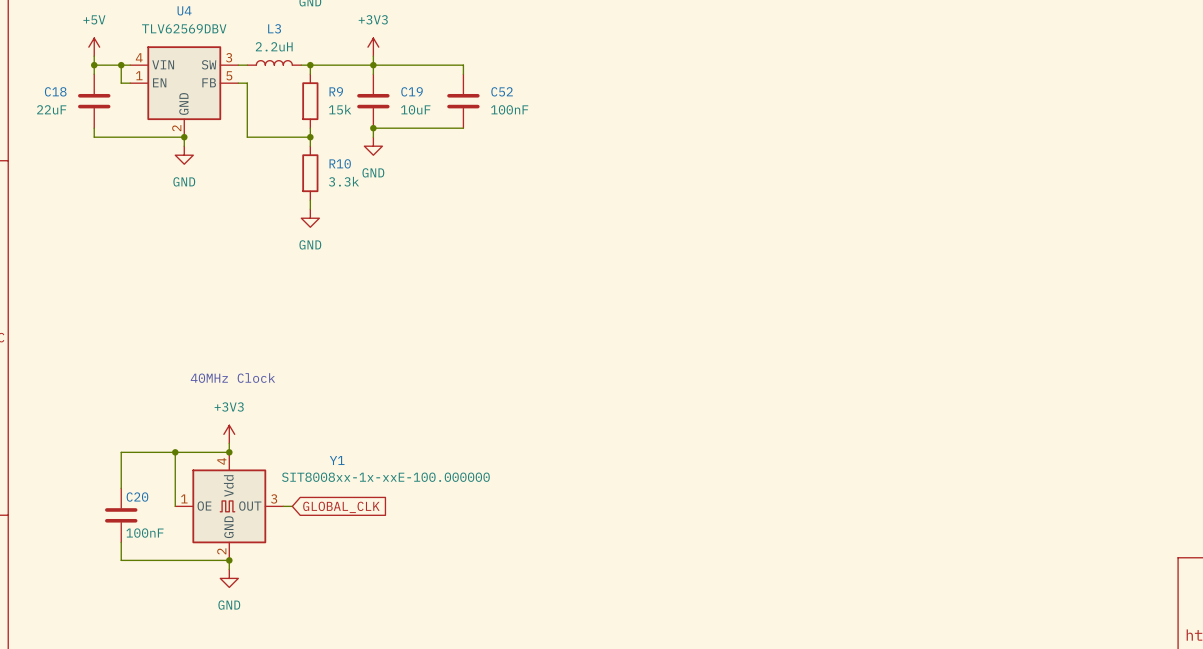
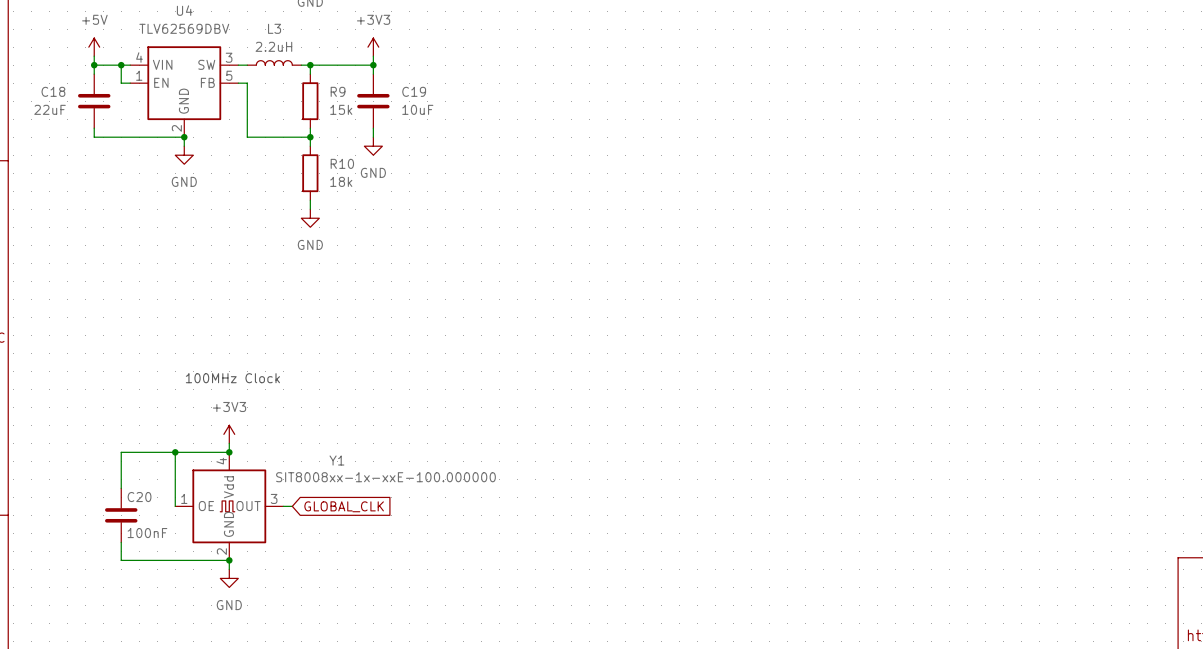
wire: (373, 65) (463, 65) (463, 74) -> none
C52: 100nF (463, 101) -> none
wire: (373, 128) (463, 128) -> none
junction: (373, 128) -> none
R10 value: 3.3k (343, 181) -> 18k (341, 181)
text: 40MHz Clock (232, 378) -> 100MHz Clock (232, 378)

